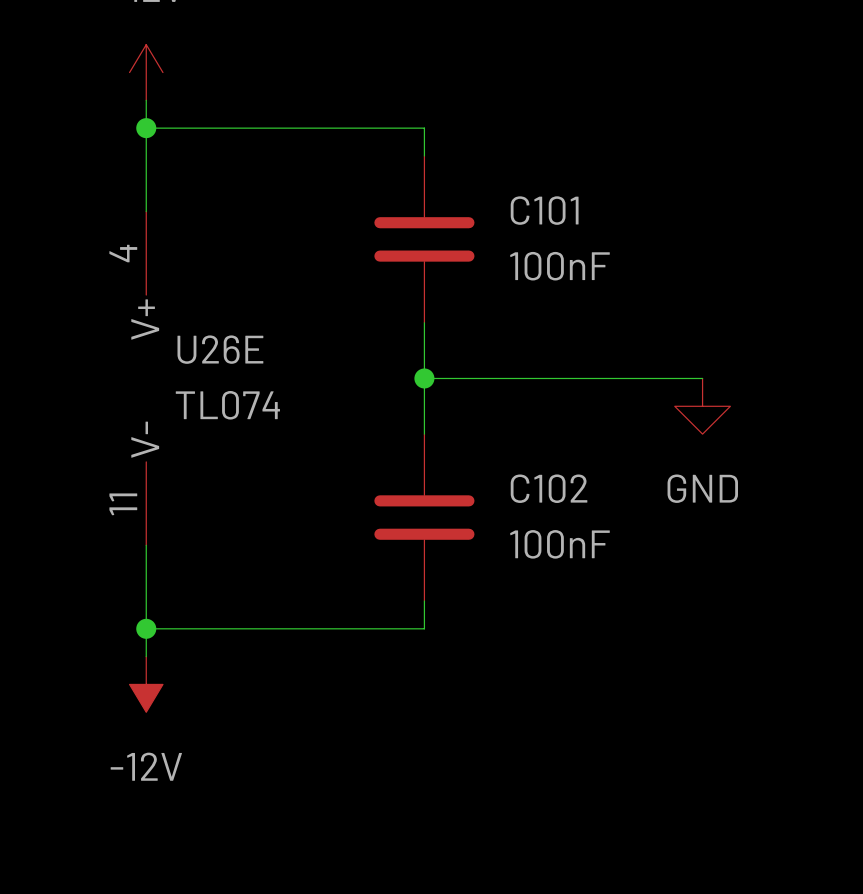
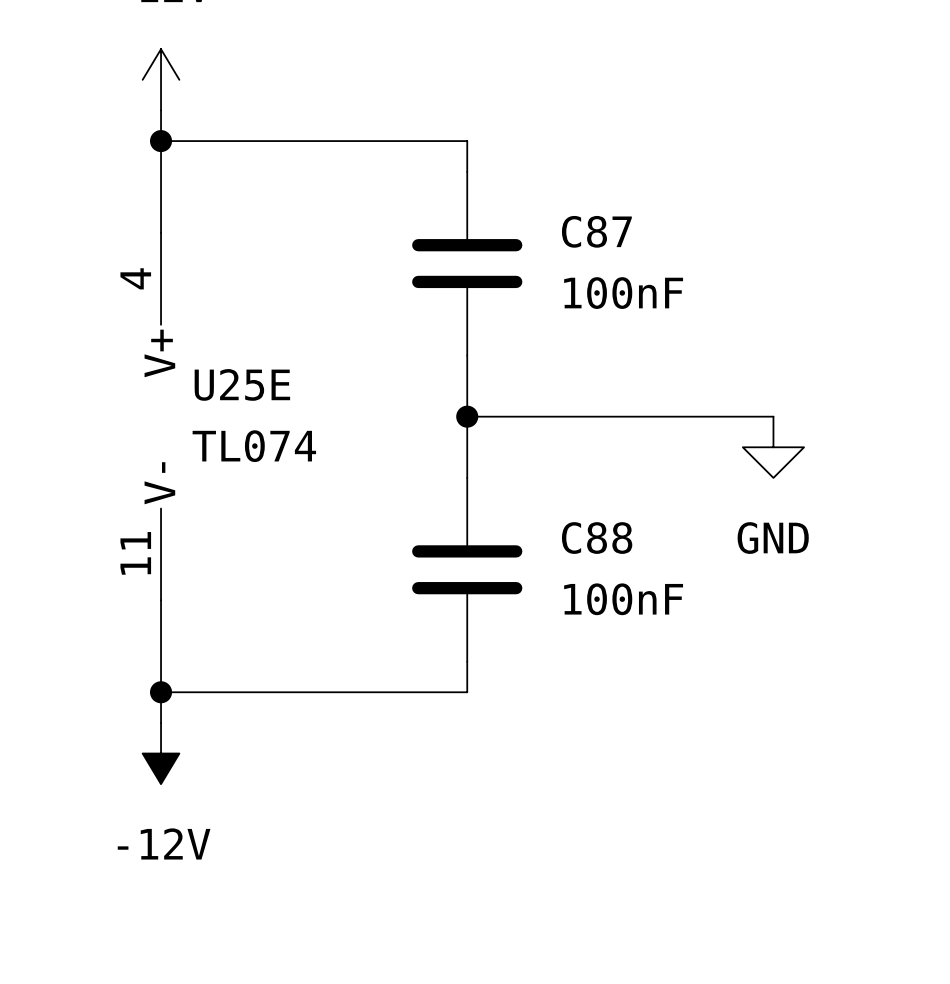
C101 name: C101 (544, 210) -> C87 (596, 231)
U26E name: U26E (220, 349) -> U25E (242, 384)
C102 name: C102 (549, 488) -> C88 (597, 538)

